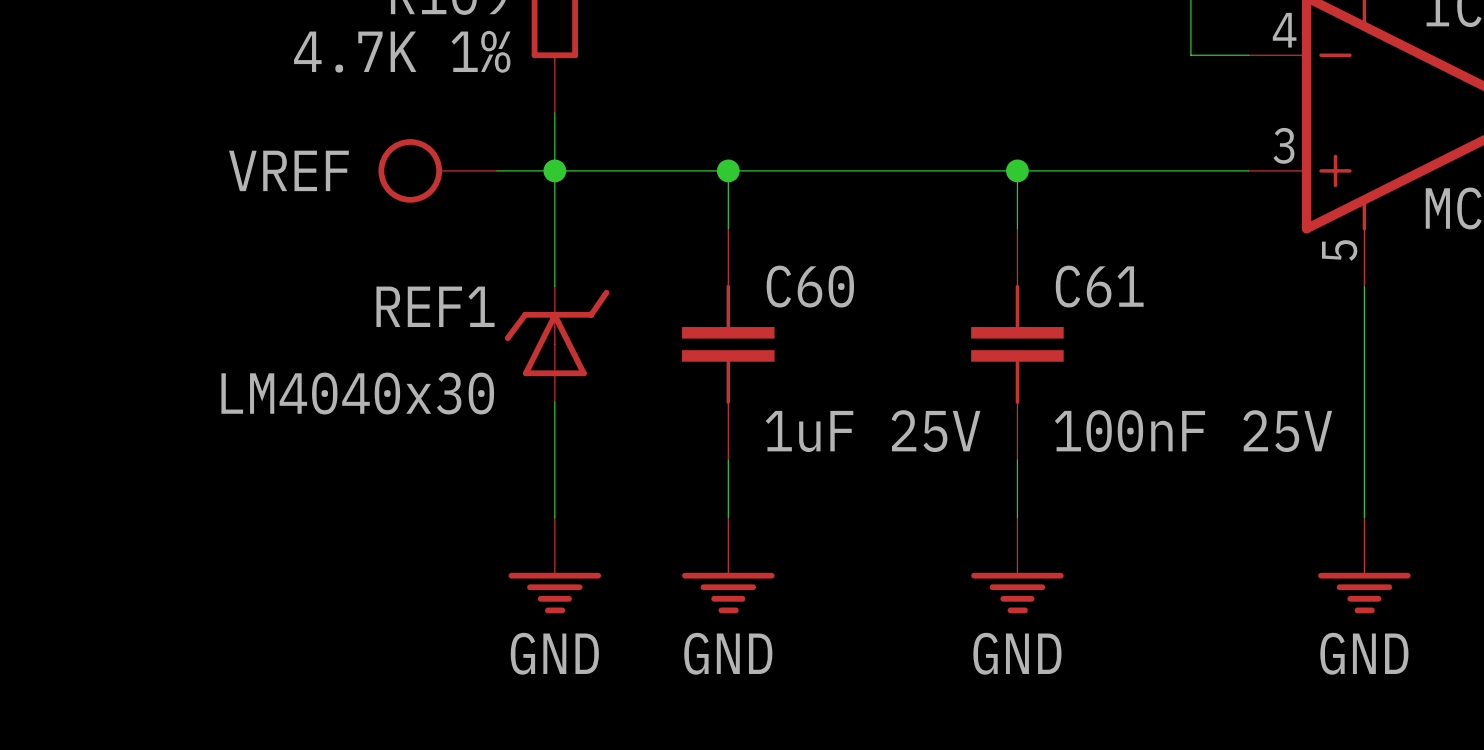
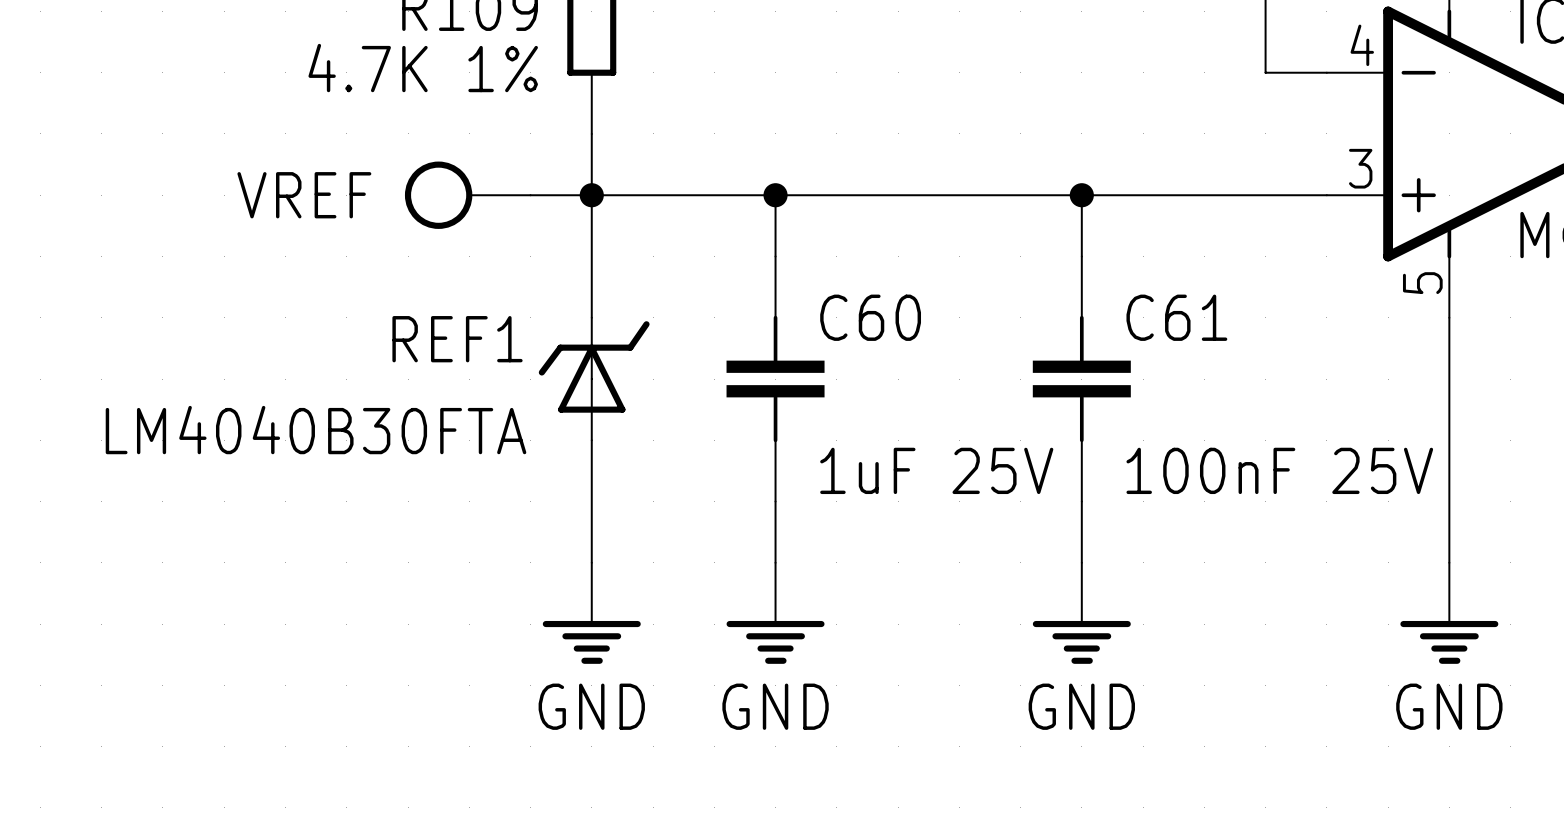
REF1 value: LM4040x30 (357, 393) -> LM4040B30FTA (316, 430)

